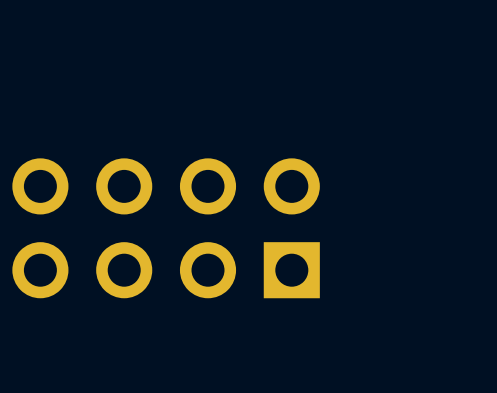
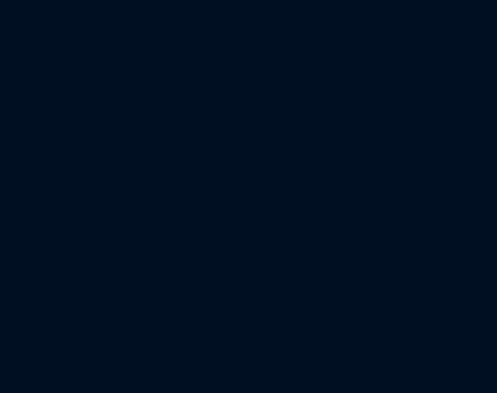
part: (166, 228) -> none

